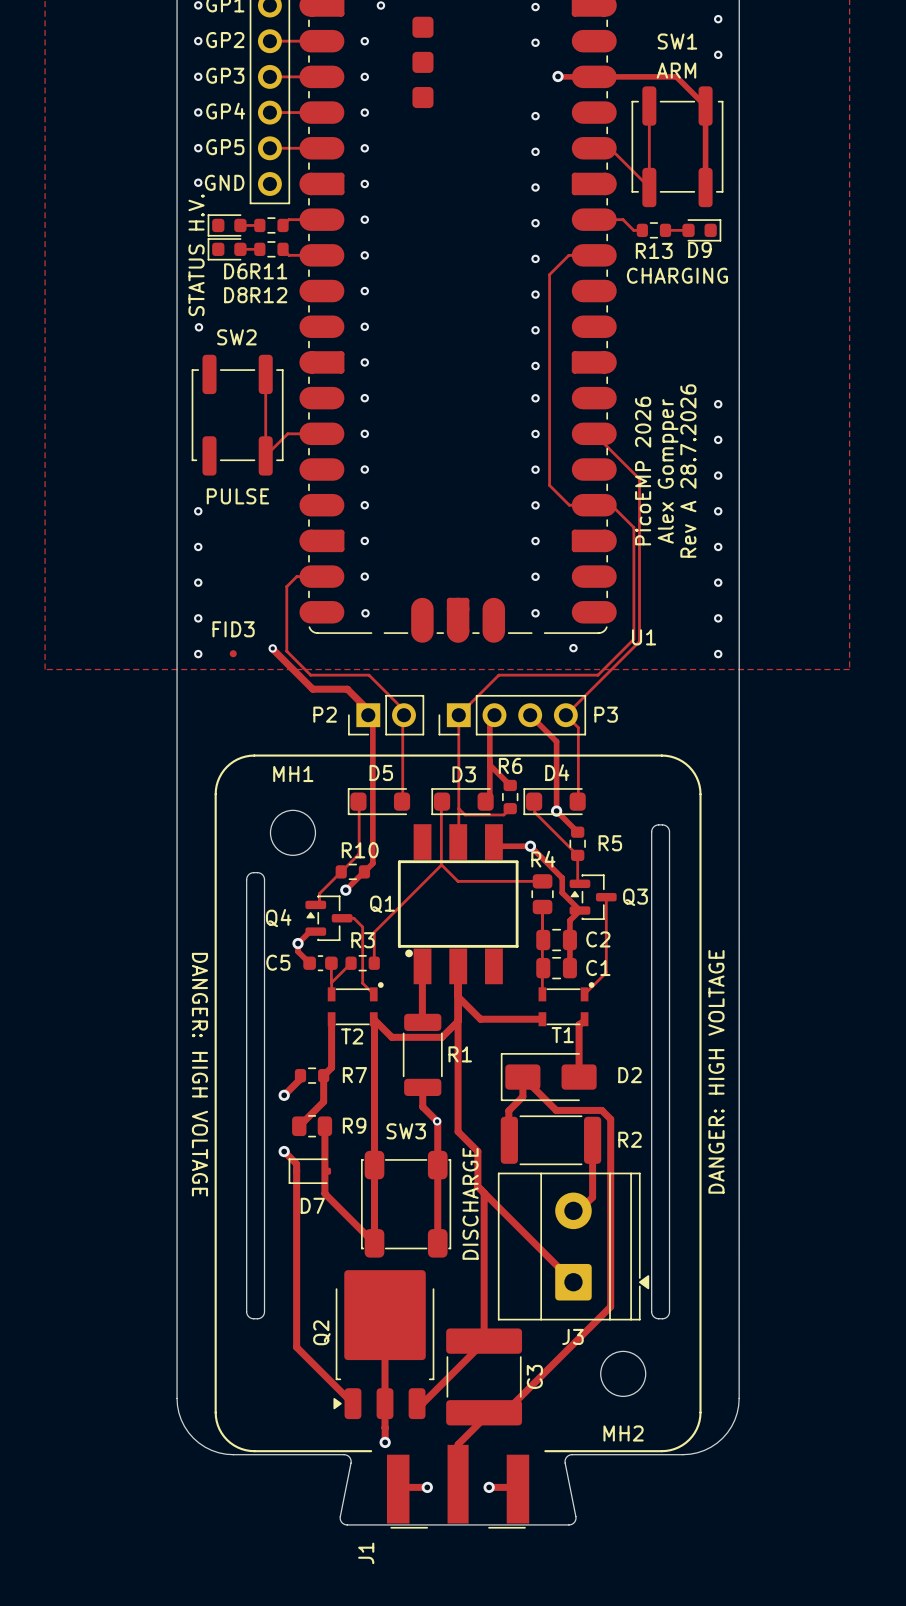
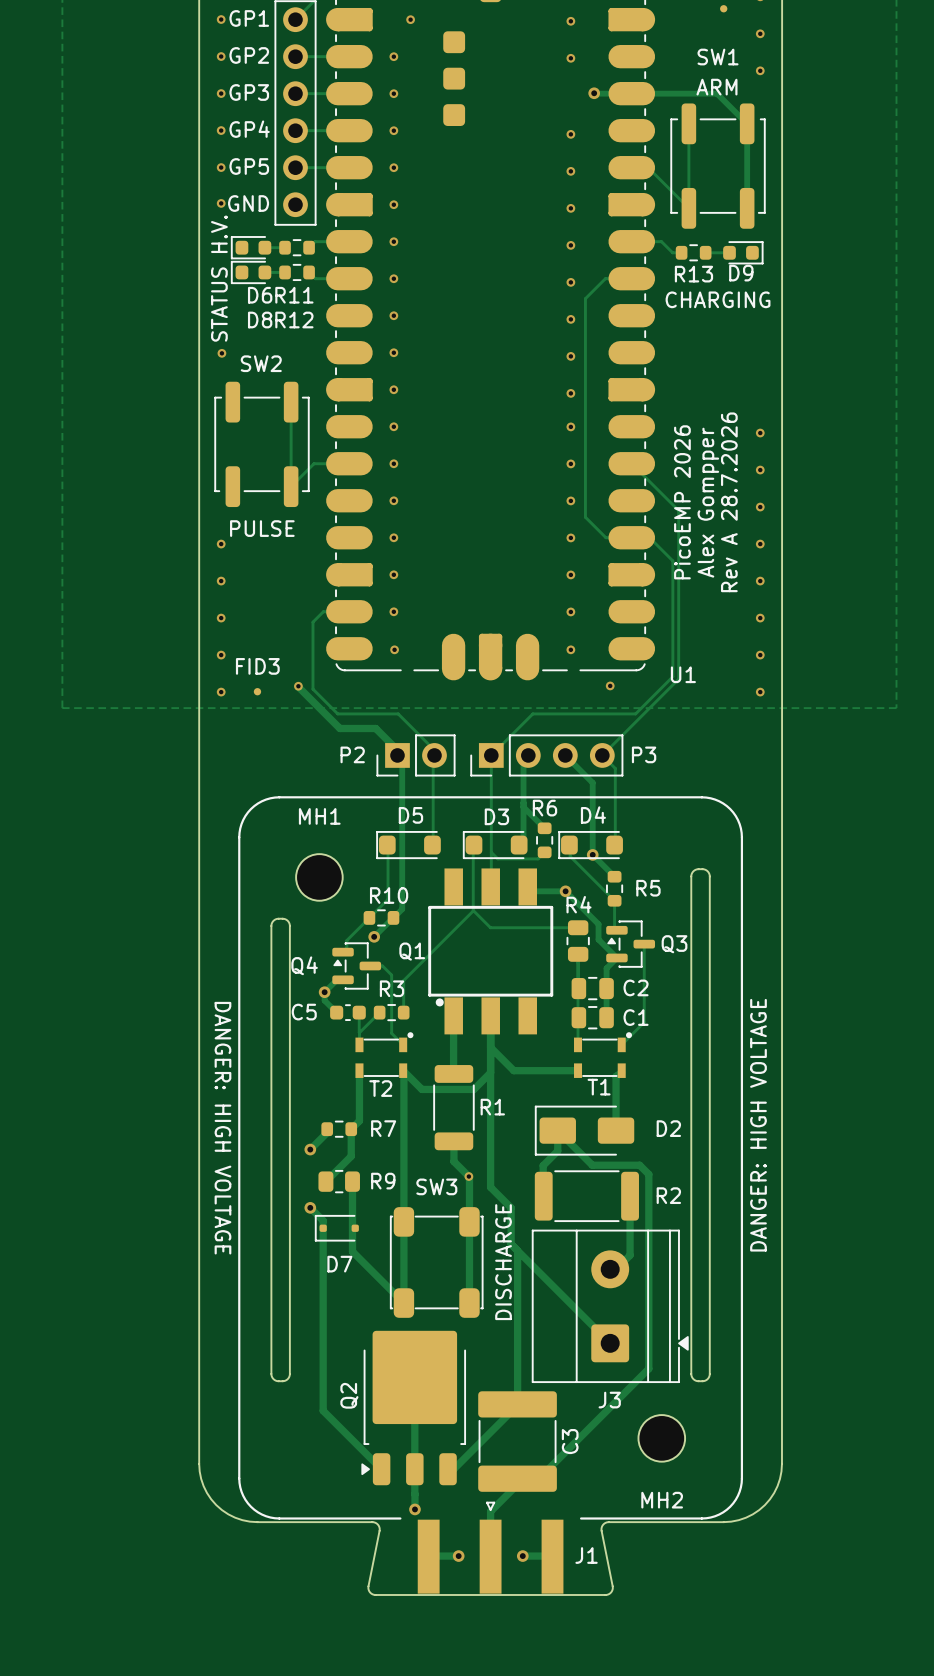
J1 footprint: [386, 1444, 530, 1529] -> [417, 1501, 564, 1594]
J1 name position: J1 (366, 1553) -> J1 (586, 1555)

